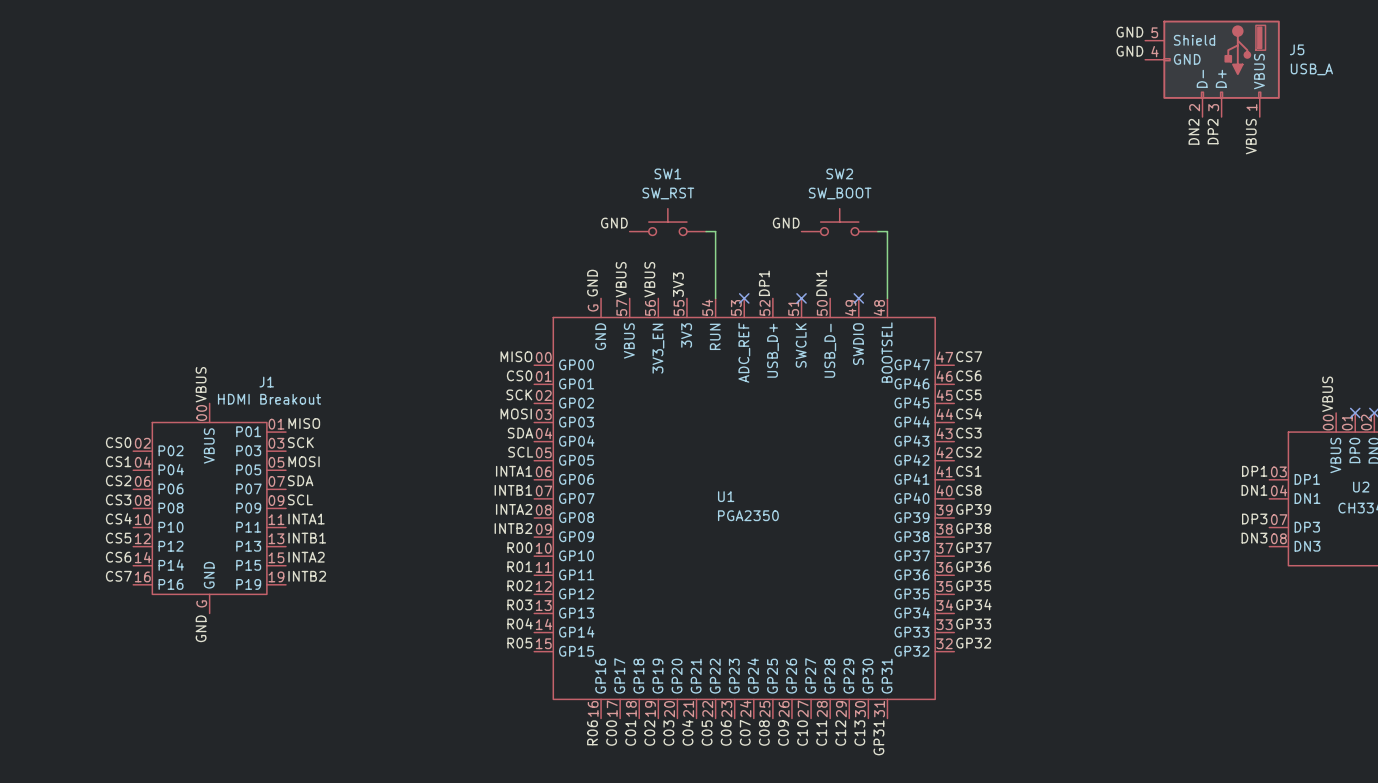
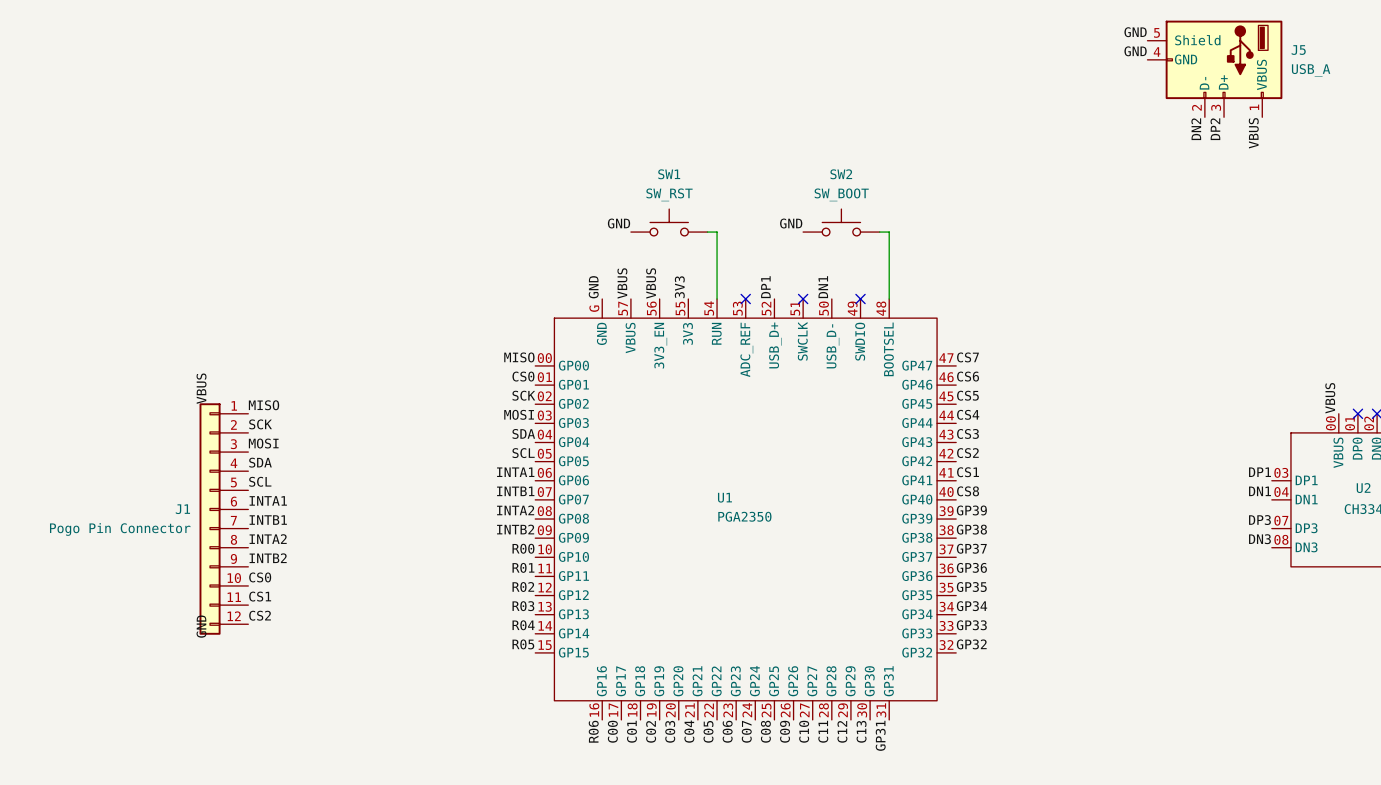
J1 name position: J1 (266, 382) -> J1 (182, 509)
J1 value: HDMI Breakout (269, 399) -> Pogo Pin Connector (120, 529)
J1 symbol: [133, 403, 287, 614] -> [199, 403, 249, 635]
label position: MISO (304, 423) -> MISO (264, 405)
label position: CS0 (118, 442) -> CS0 (260, 577)
label position: SCK (300, 442) -> SCK (260, 424)
label position: CS1 (118, 461) -> CS1 (260, 596)
label position: MOSI (304, 461) -> MOSI (263, 443)
label position: CS2 (118, 480) -> CS2 (260, 615)
label position: SDA (300, 480) -> SDA (260, 462)
label: CS3 (118, 499) -> none
label position: SCL (300, 499) -> SCL (260, 481)
label: CS4 (118, 518) -> none
label position: INTA1 (306, 519) -> INTA1 (268, 500)
label: CS5 (118, 538) -> none
label position: INTB1 (307, 538) -> INTB1 (268, 520)
label: CS6 (118, 557) -> none
label position: INTA2 (306, 557) -> INTA2 (268, 539)
label: CS7 (118, 576) -> none
label position: INTB2 (307, 576) -> INTB2 (268, 558)

